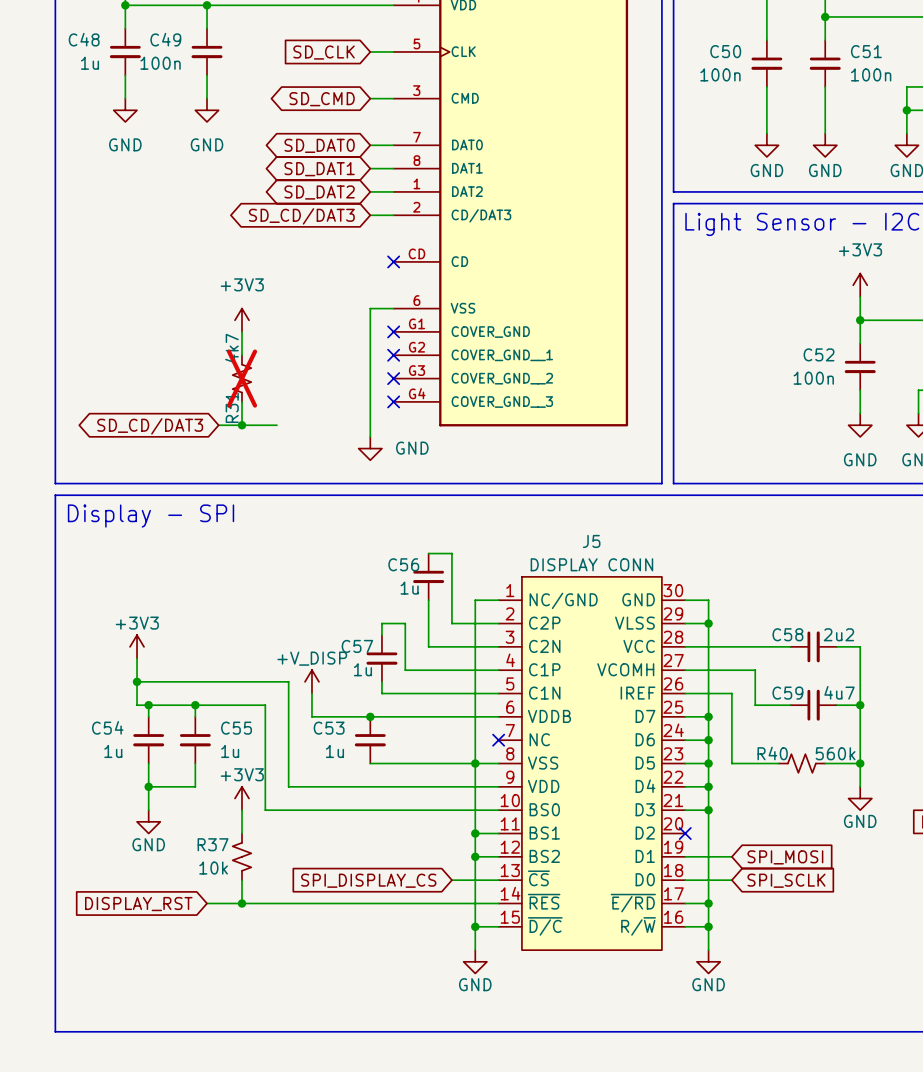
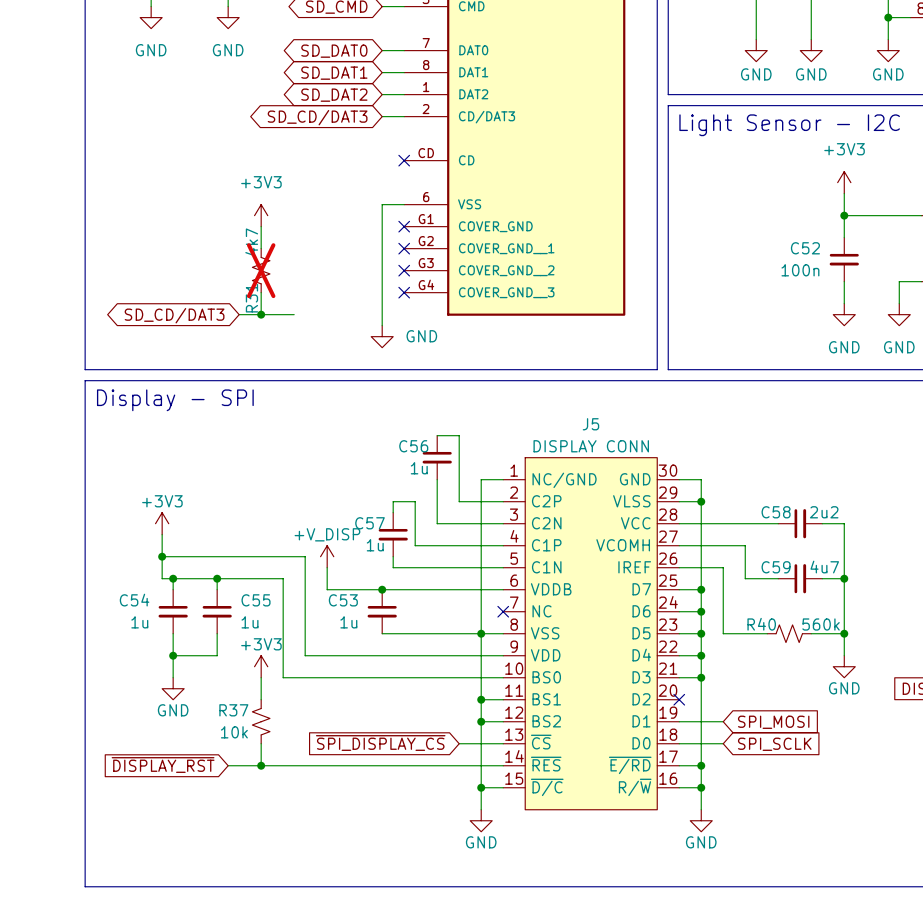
global label: SPI_DISPLAY_CS (368, 880) -> ~{SPI_DISPLAY_CS} (380, 743)
global label: DISPLAY_RST (138, 904) -> ~{DISPLAY_RST} (163, 765)

